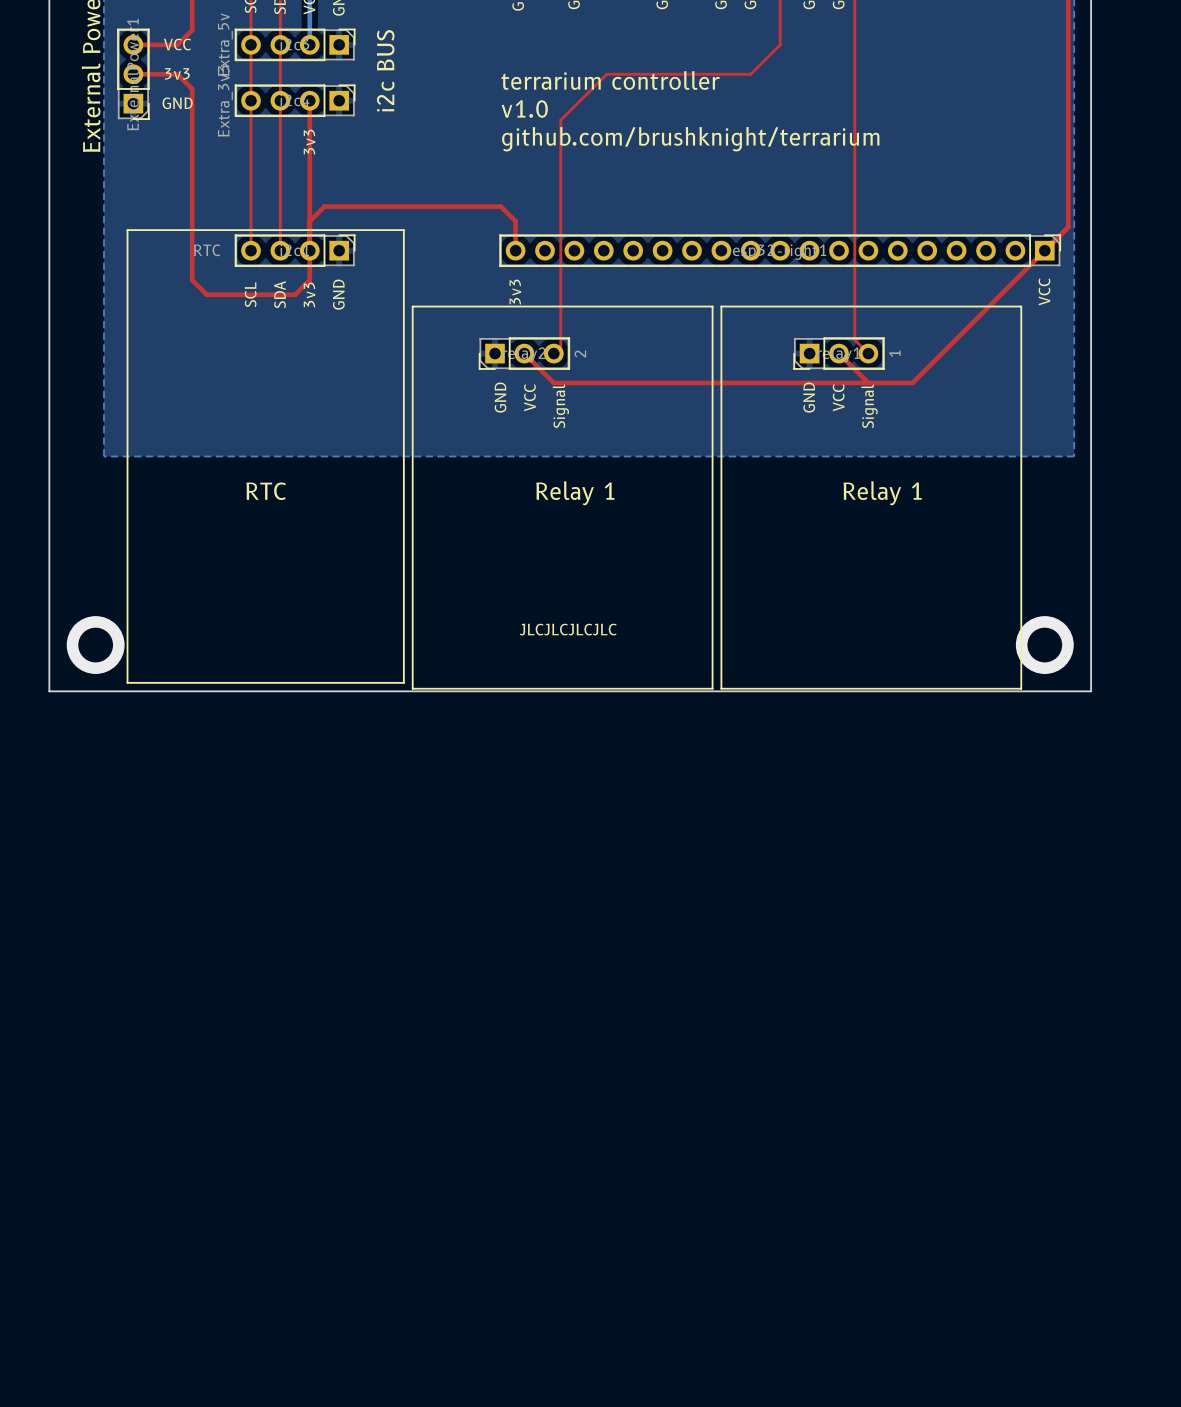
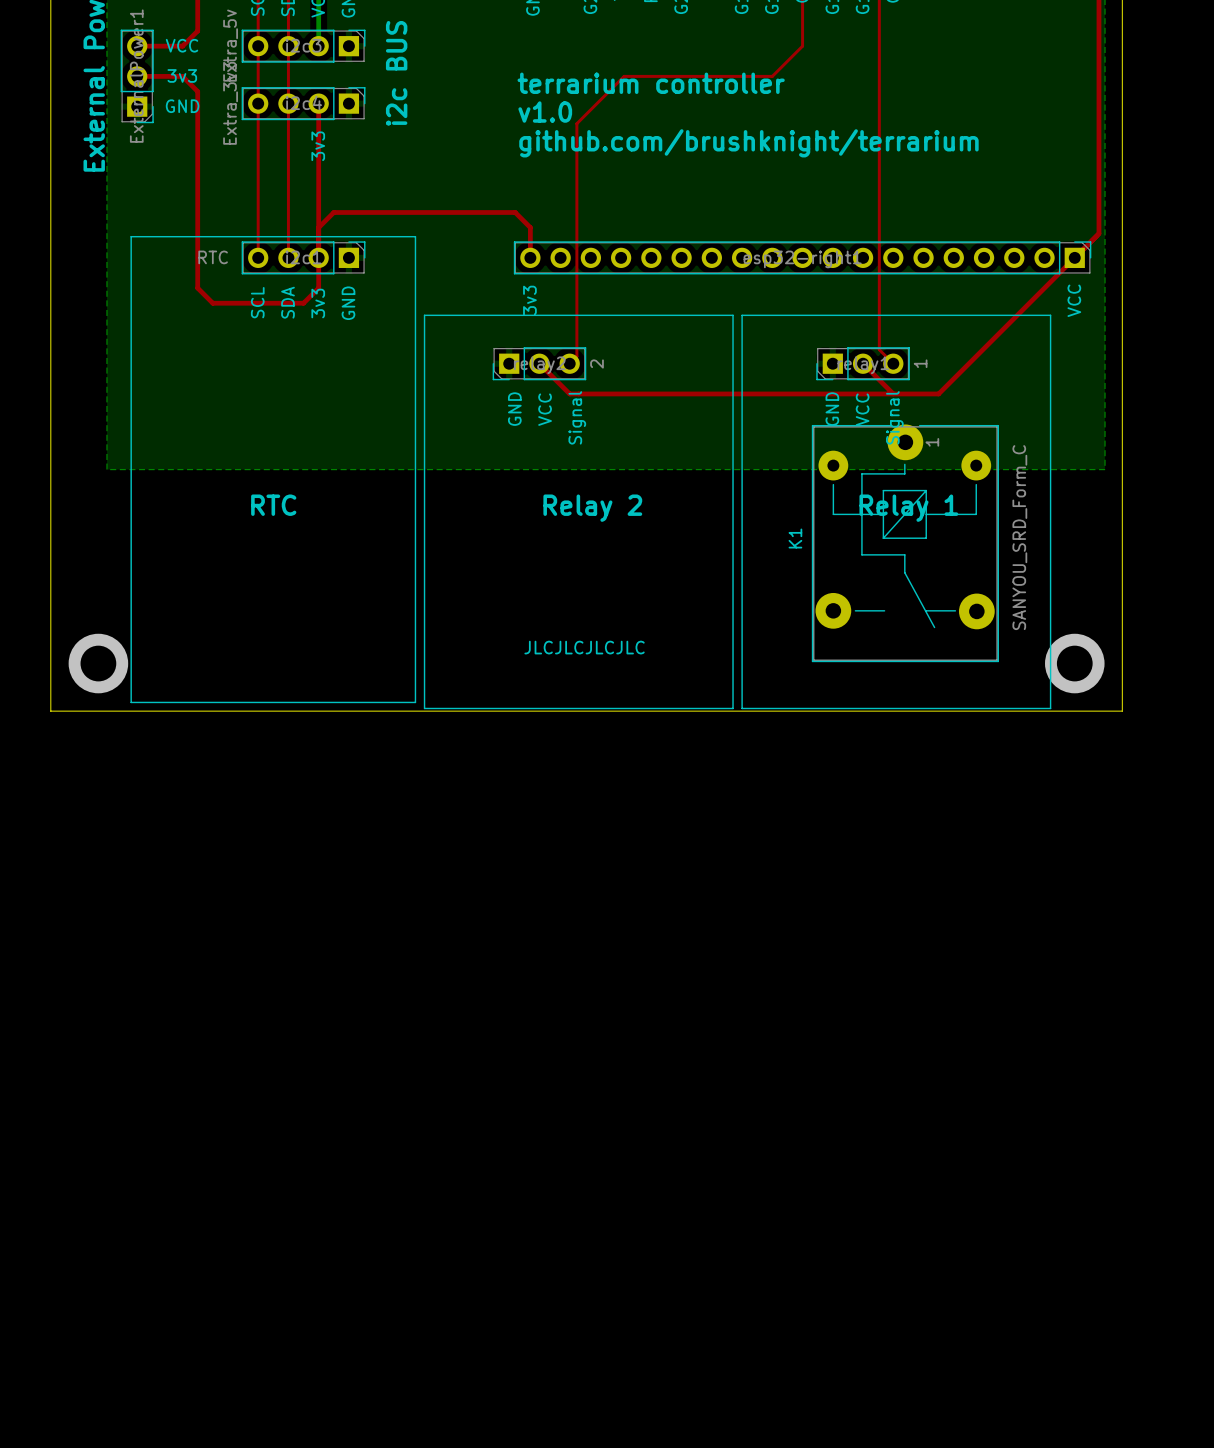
text: Relay 1 (575, 493) -> Relay 2 (592, 508)
K1: none -> SANYOU_SRD_Form_C (905, 543)

